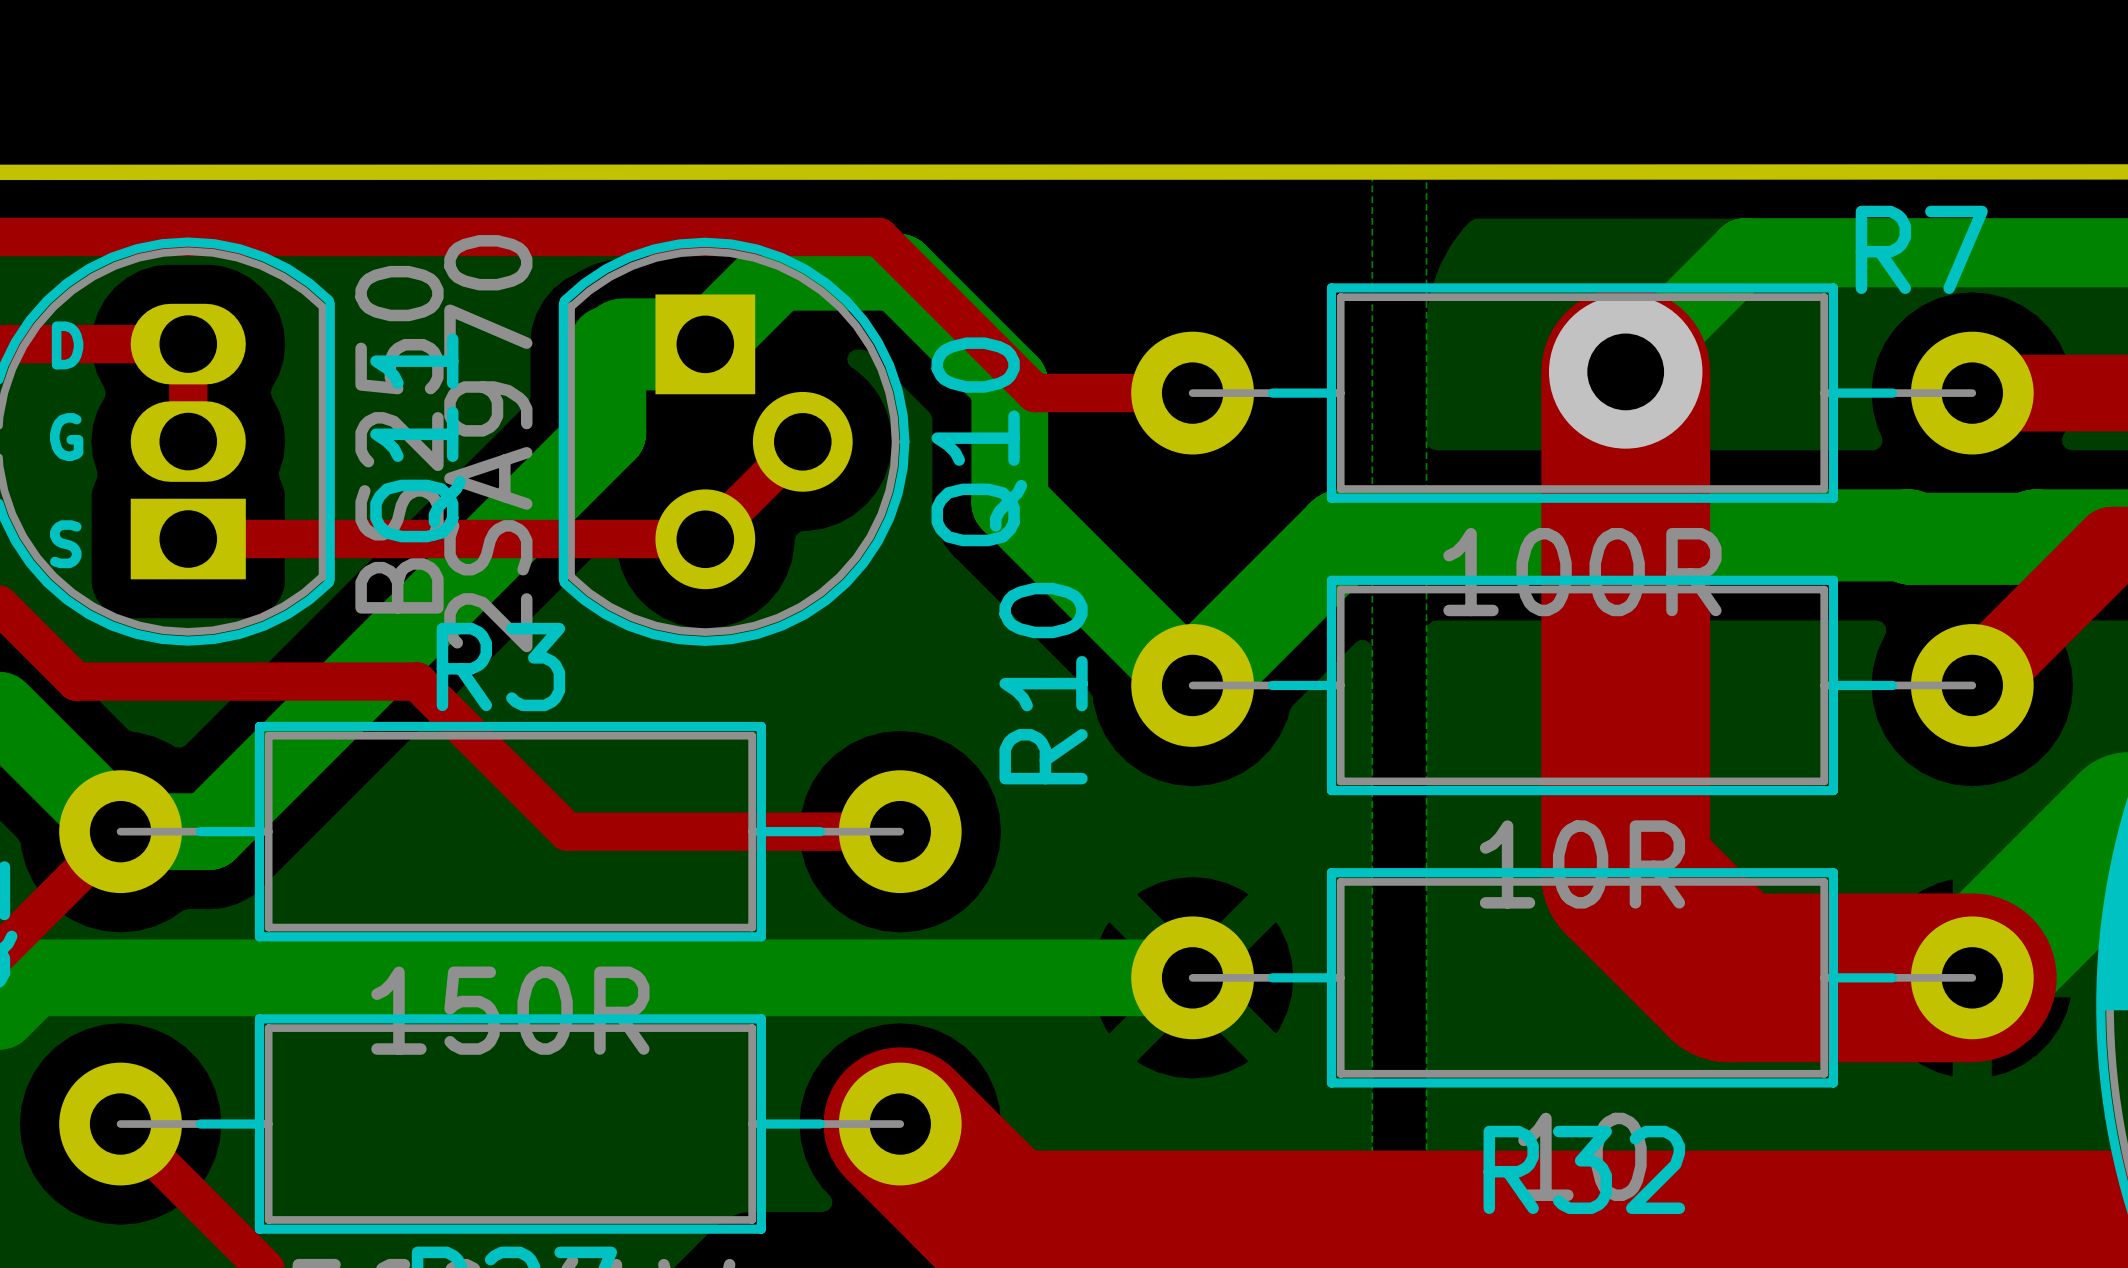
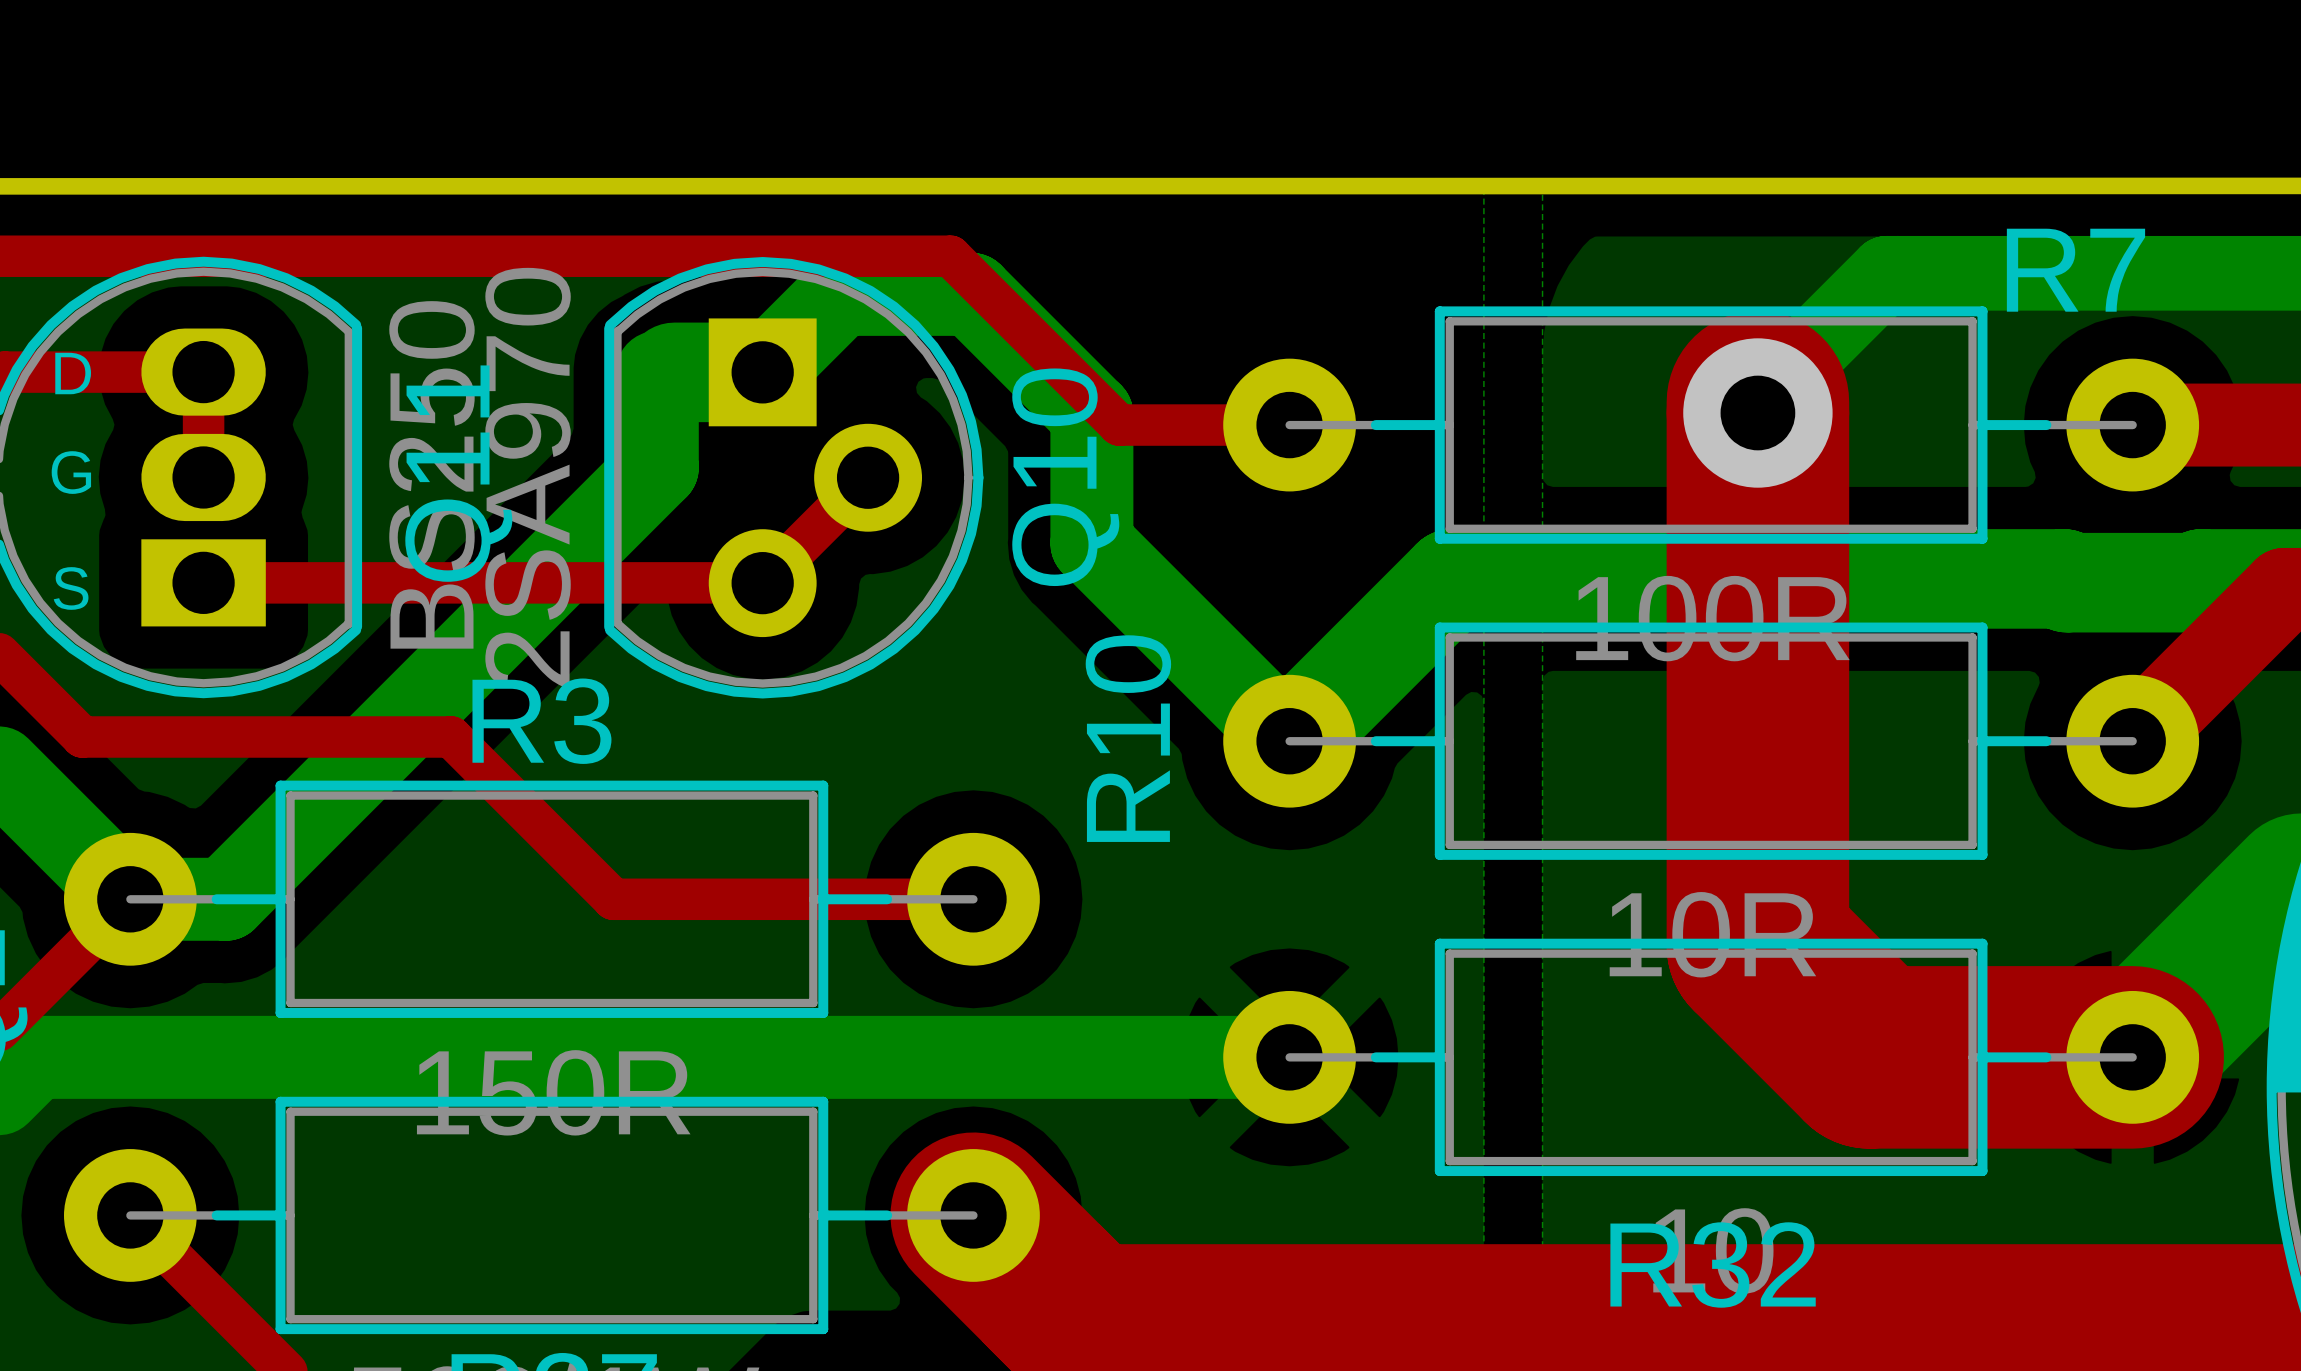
via size: [1548, 295, 1703, 449] -> [1683, 338, 1833, 488]

